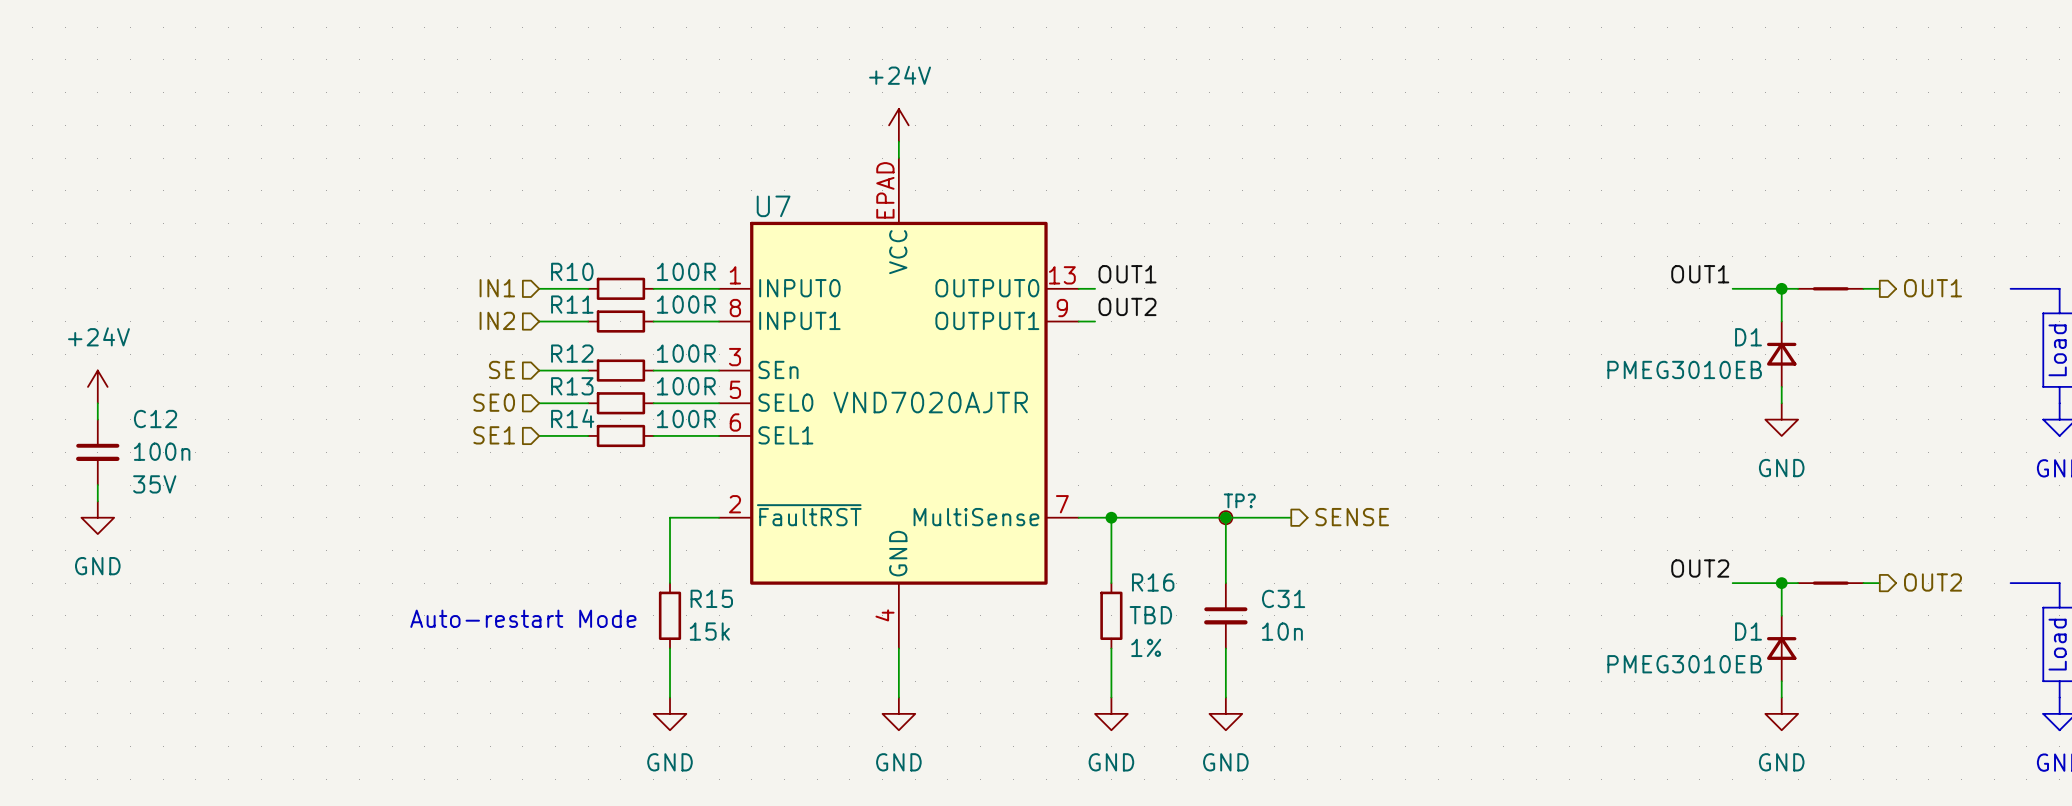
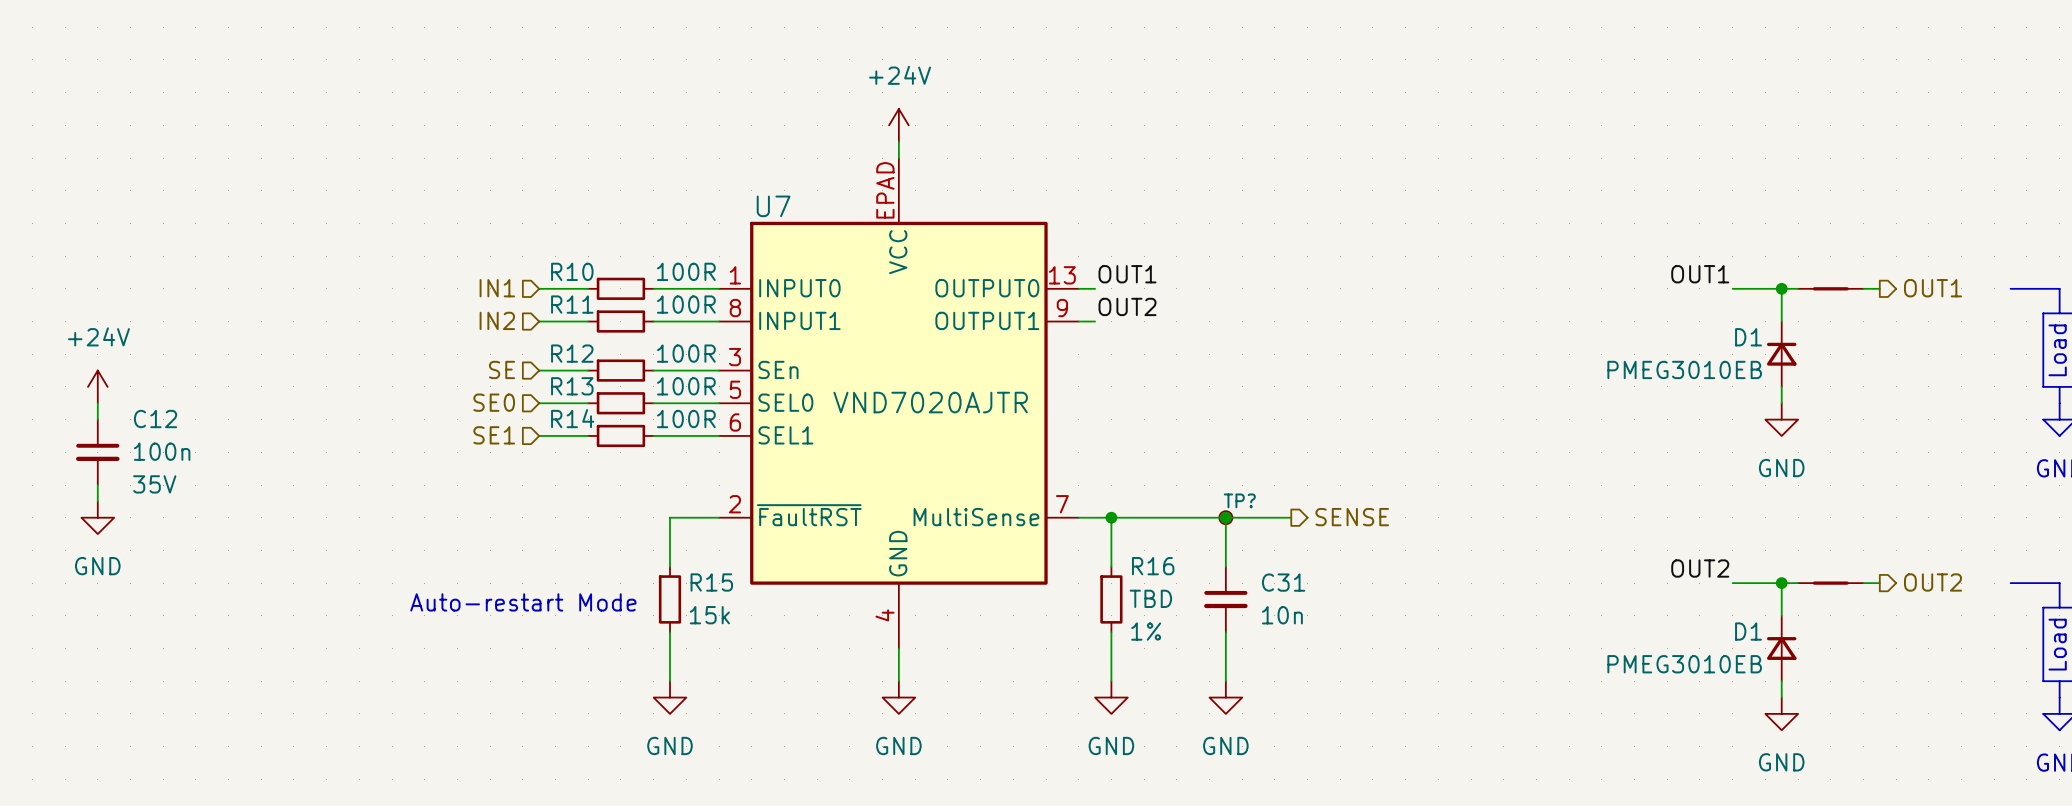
R15 position: (670, 615) -> (670, 599)
R16 position: (1111, 615) -> (1111, 599)
C31 position: (1225, 615) -> (1225, 599)
text position: Auto-restart Mode (523, 618) -> Auto-restart Mode (523, 602)
power symbol position: GND (670, 713) -> GND (670, 697)
power symbol position: GND (898, 713) -> GND (898, 697)
power symbol position: GND (1111, 713) -> GND (1111, 697)
power symbol position: GND (1225, 713) -> GND (1225, 697)

